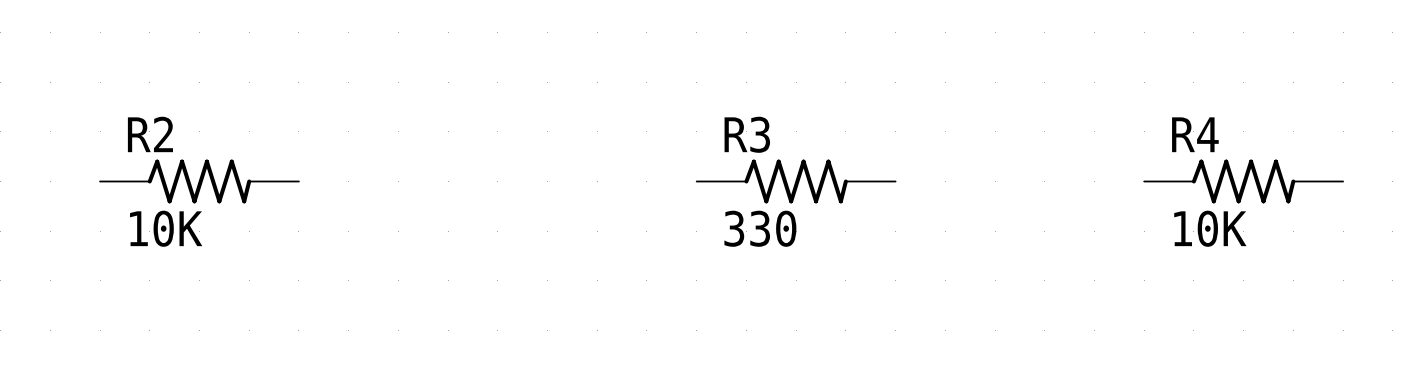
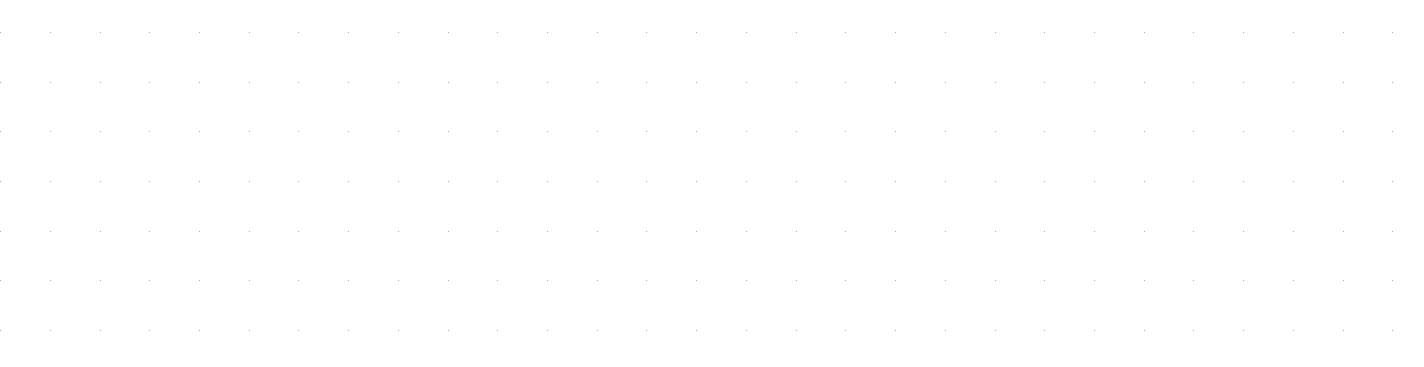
R2: 10K (199, 181) -> none
R3: 330 (796, 181) -> none
R4: 10K (1243, 181) -> none

